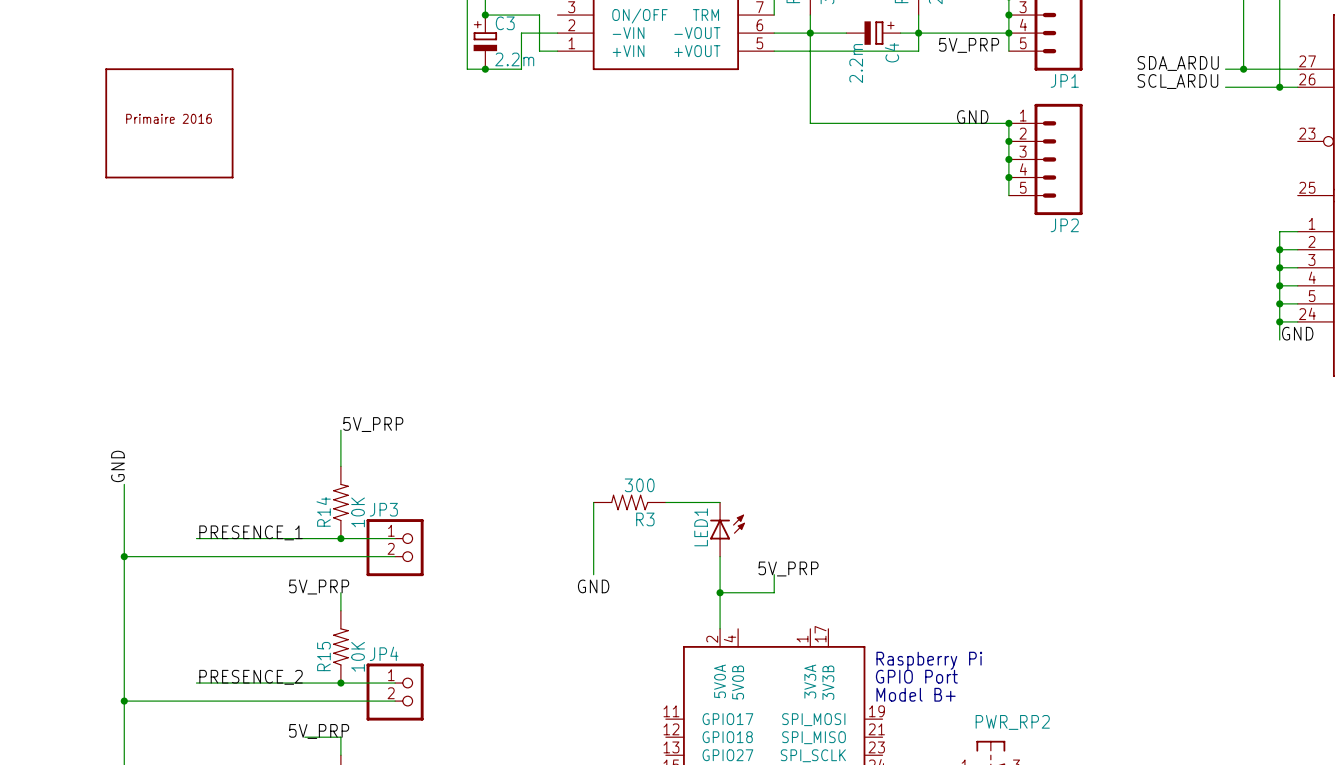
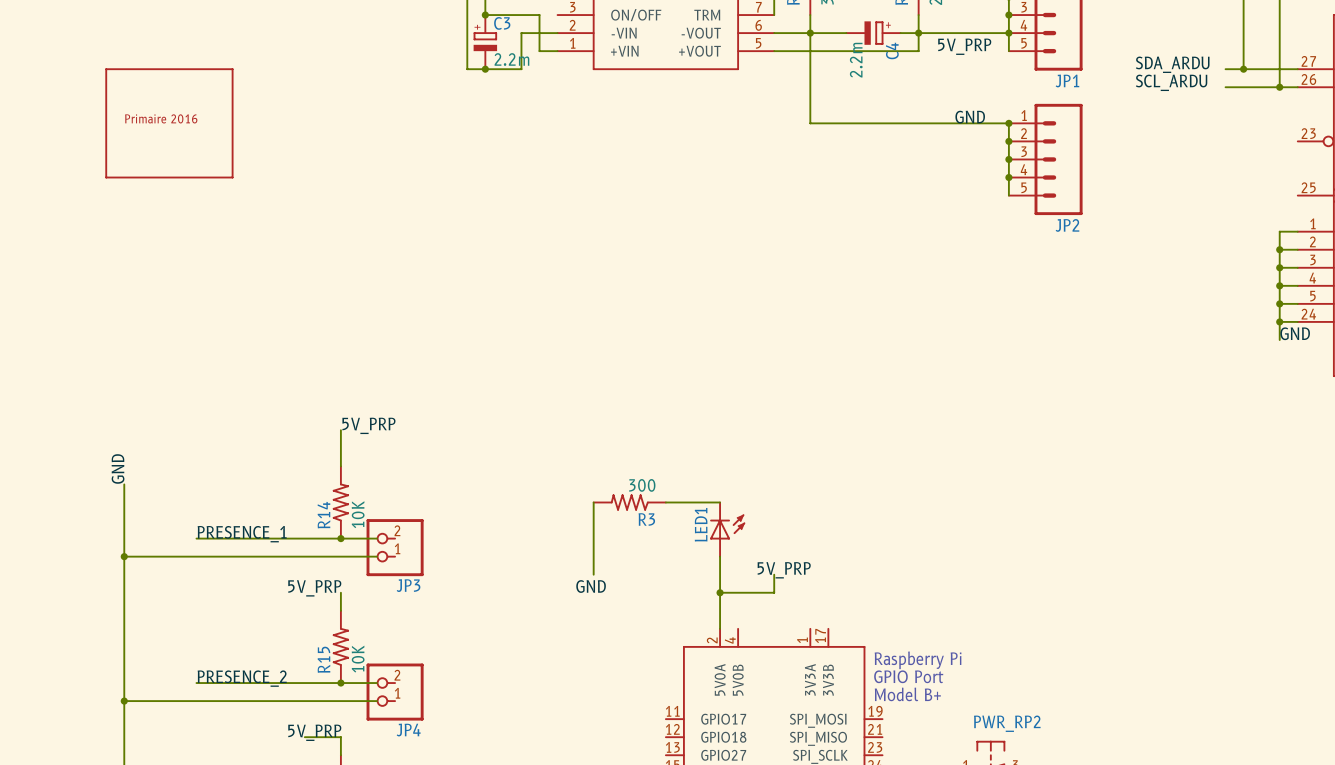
wire: (377, 538) (395, 538) -> none
JP3 rotation: 0° (395, 547) -> 180° (395, 547)
wire: (377, 556) (395, 556) -> none
wire: (377, 683) (395, 683) -> none
JP4 rotation: 0° (395, 692) -> 180° (395, 692)
wire: (377, 701) (395, 701) -> none

